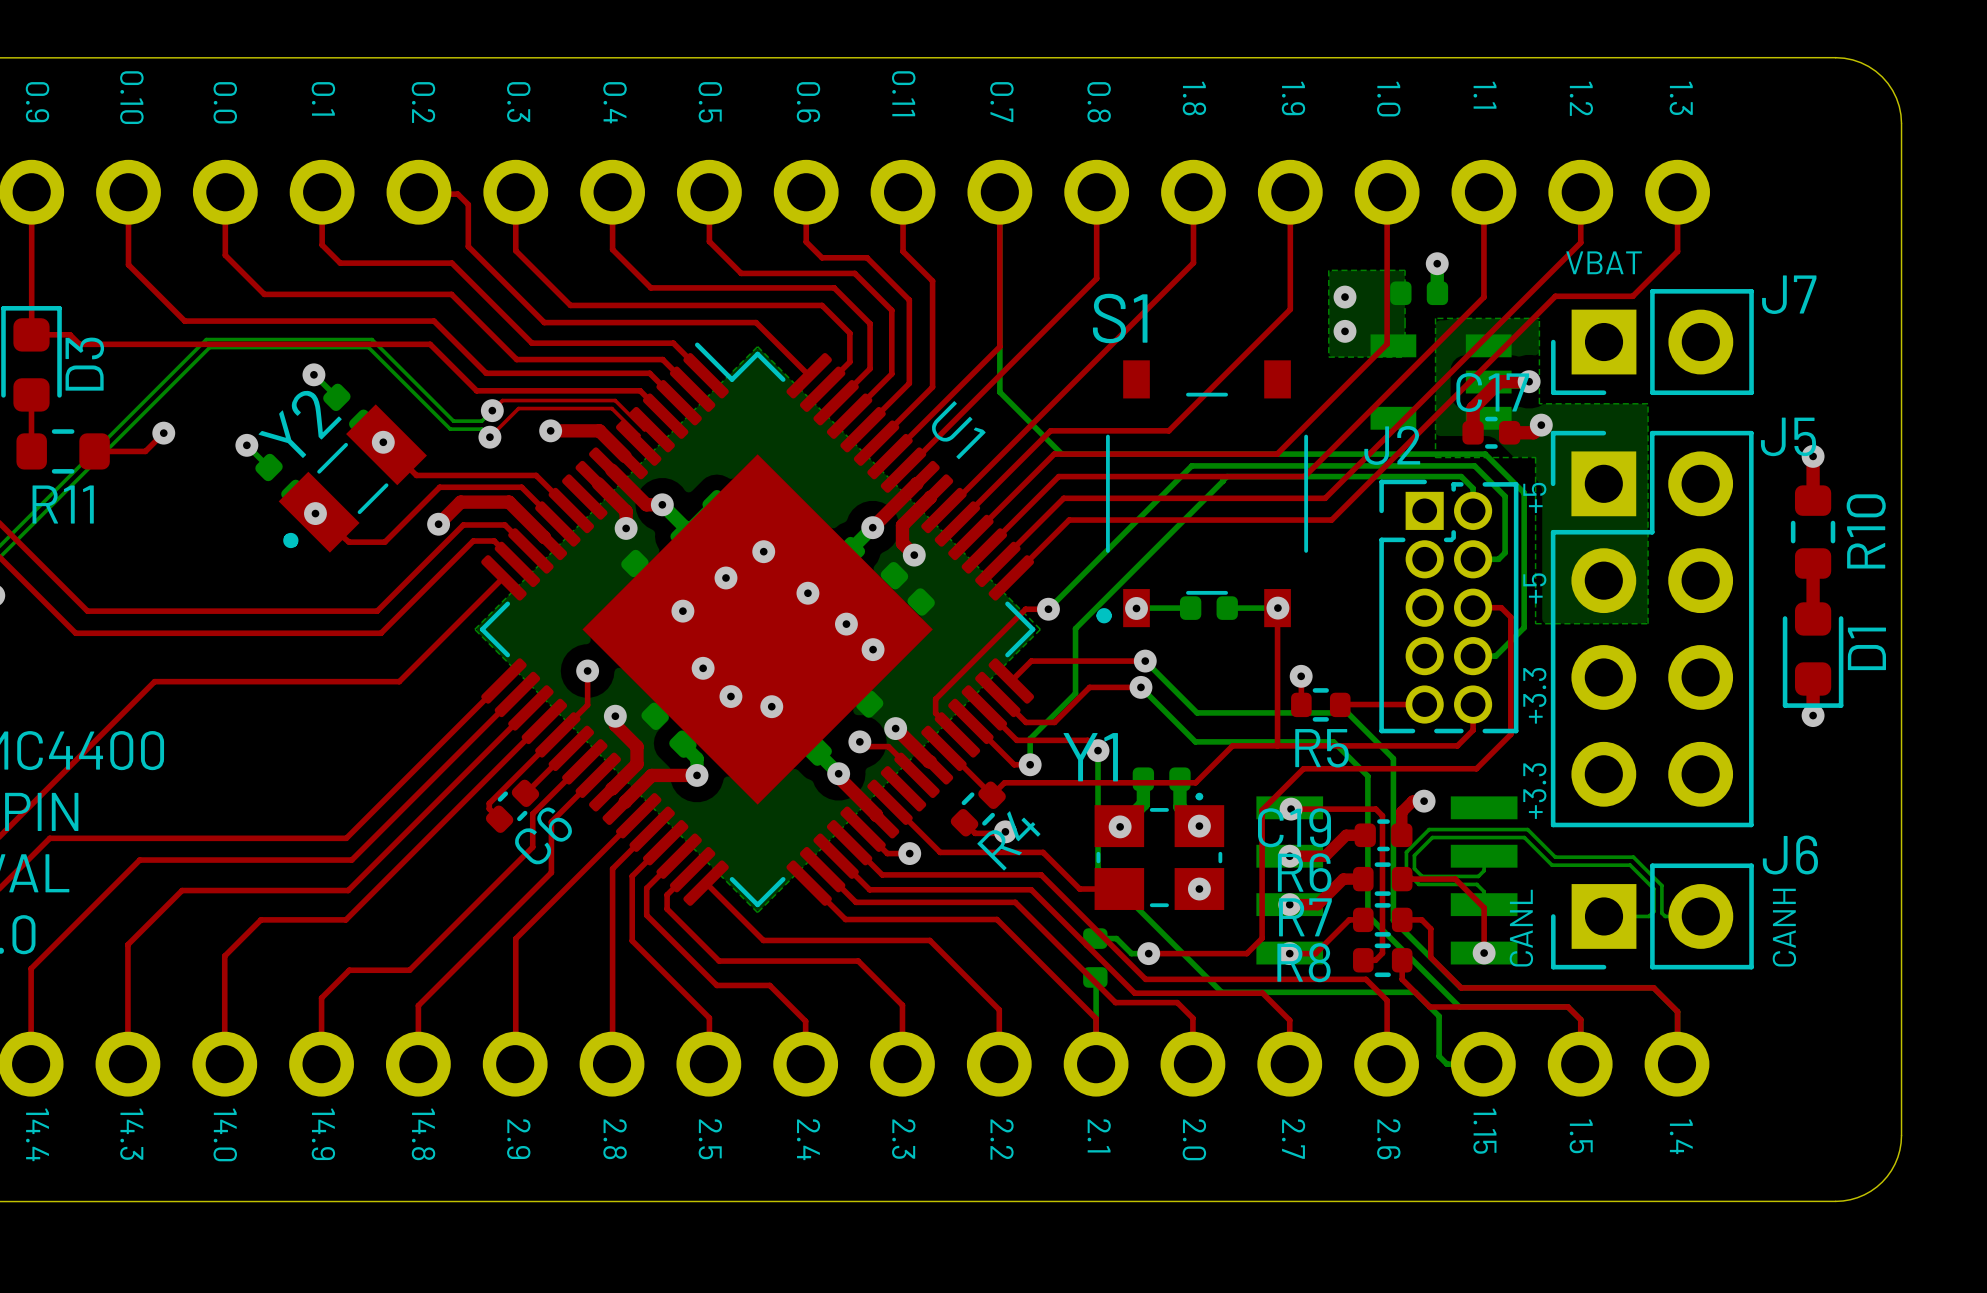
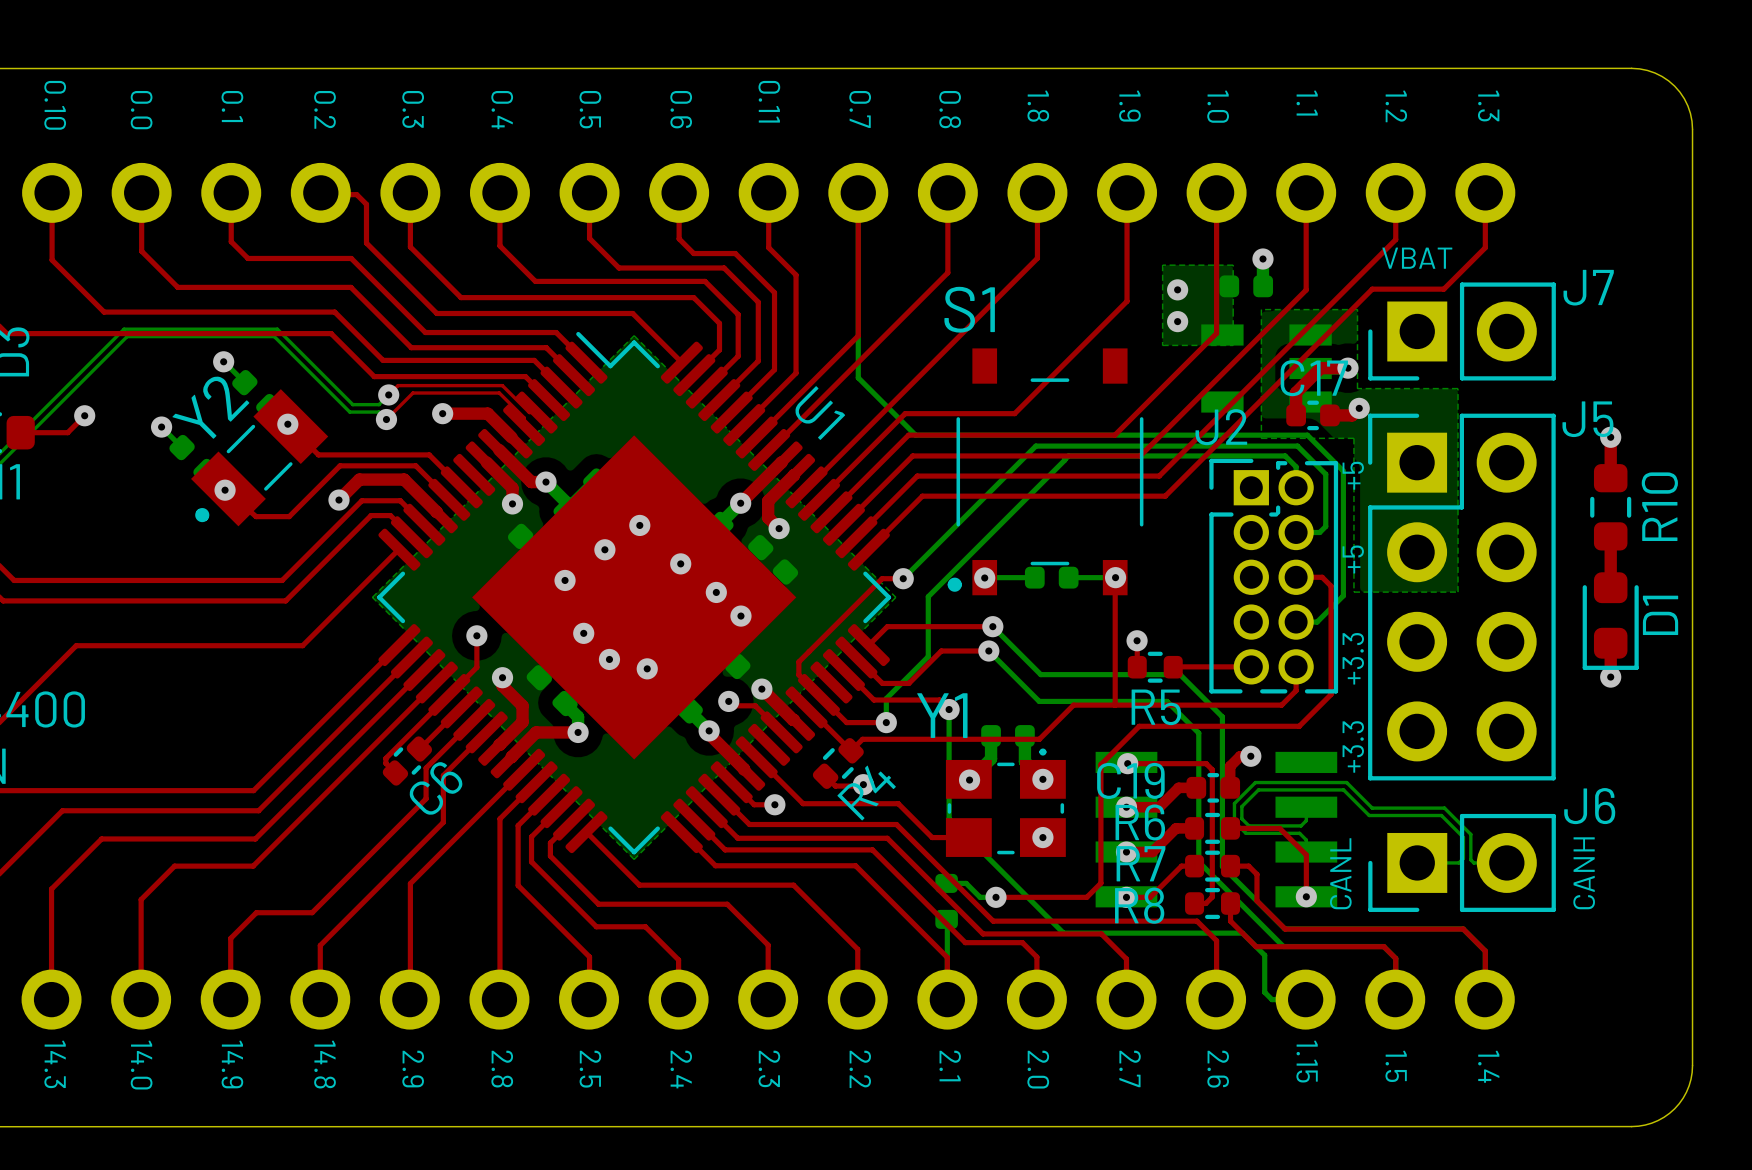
top track: (970, 721) (1014, 764) -> (819, 694) (846, 722) (871, 722)

